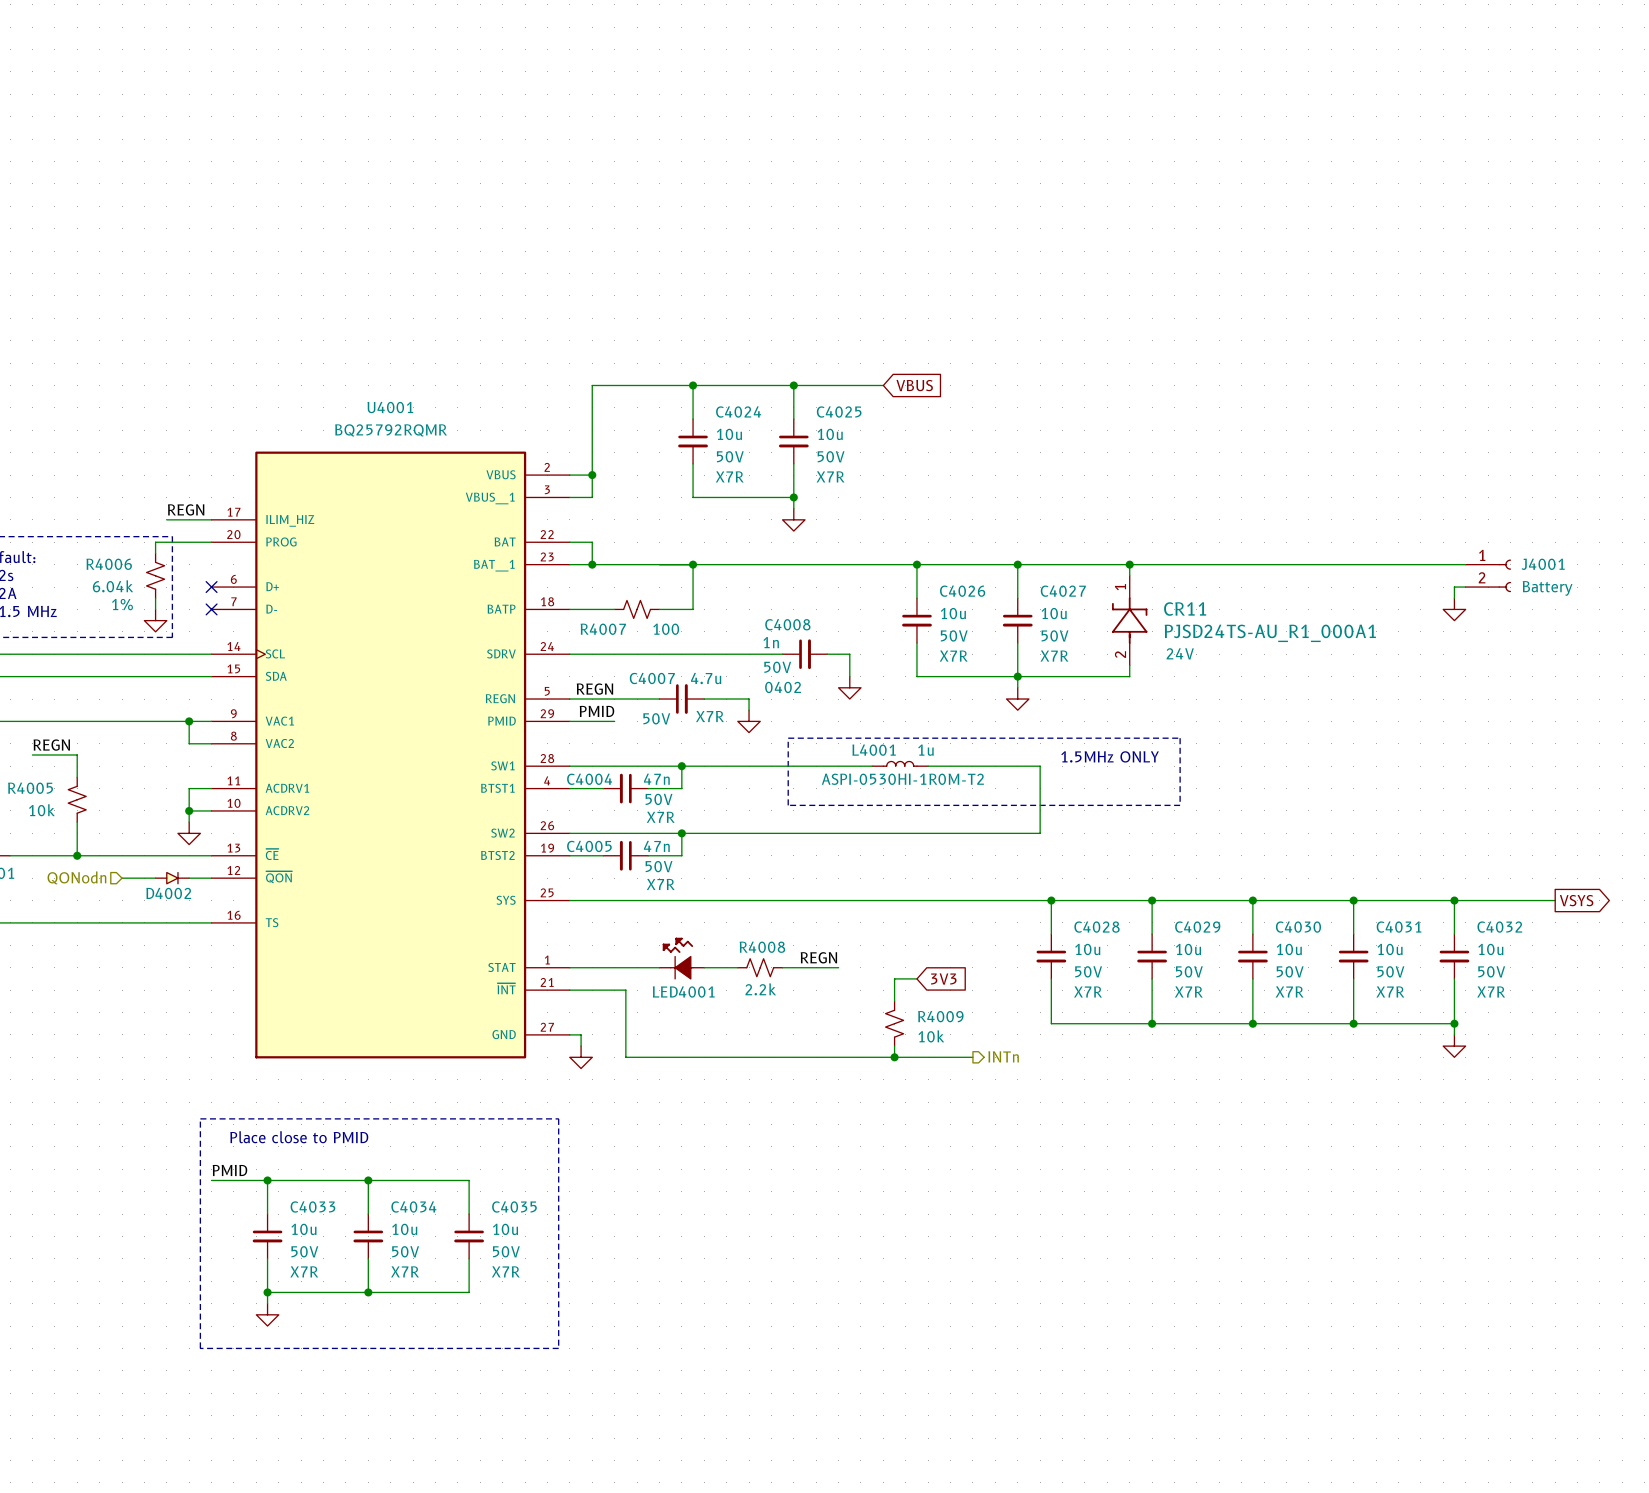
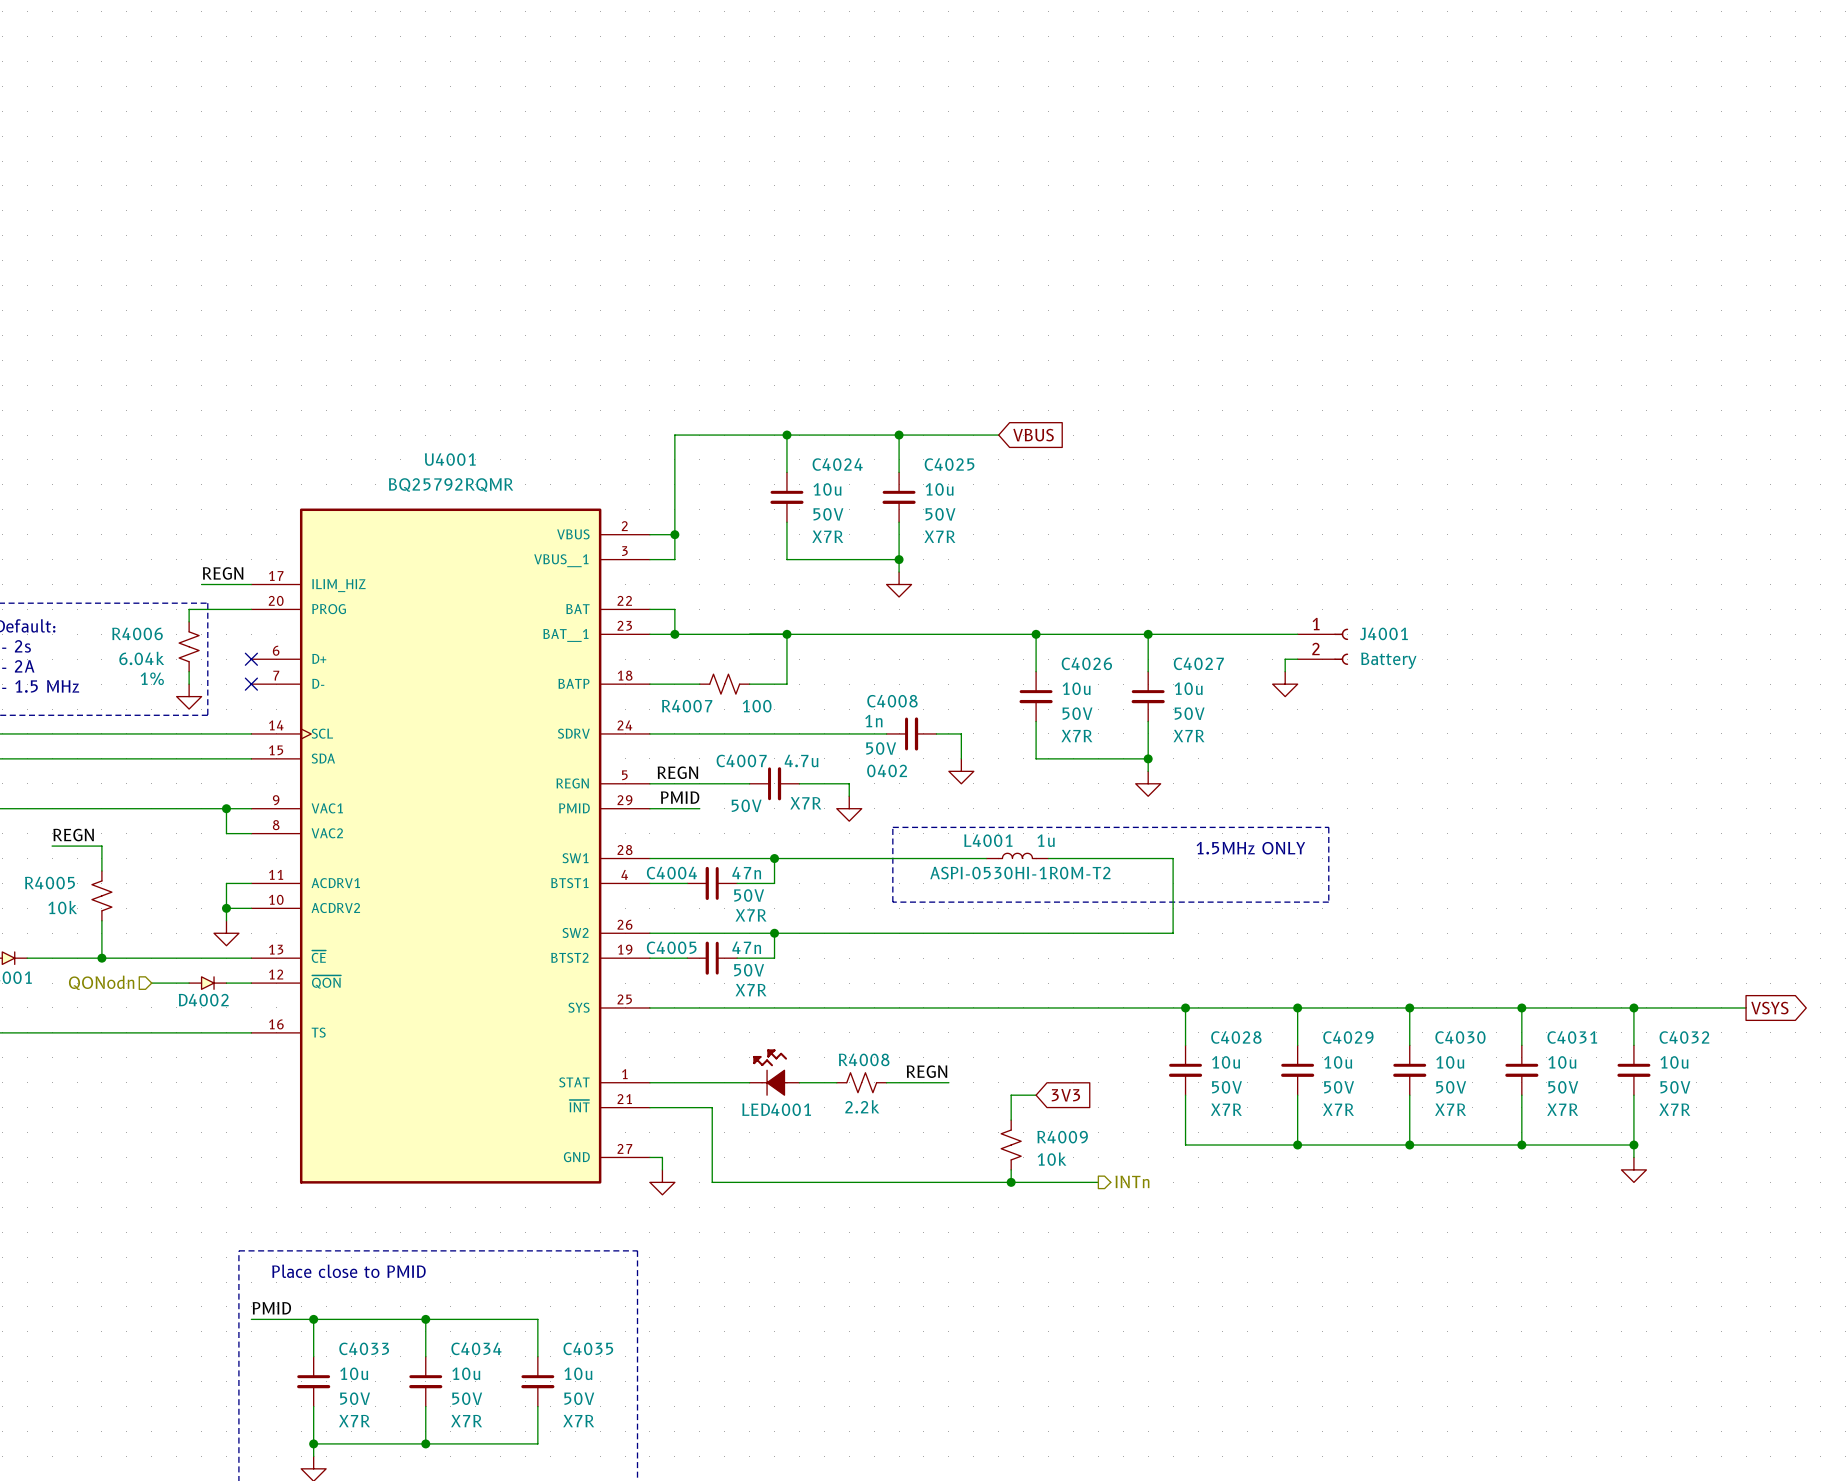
wire: (1129, 564) (1129, 575) -> none
junction: (1129, 564) -> none
wire: (1152, 564) (1465, 564) -> none
J4001 position: (1488, 575) -> (1322, 646)
wire: none -> (1297, 659) (1285, 659) (1285, 671)
wire: (1465, 587) (1454, 587) (1454, 598) -> none
power symbol: none -> (1285, 684)
power symbol: (1454, 609) -> none
CR11: PJSD24TS-AU_R1_000A1 (1129, 620) -> none
wire: (1129, 665) (1129, 676) (1017, 676) -> none

